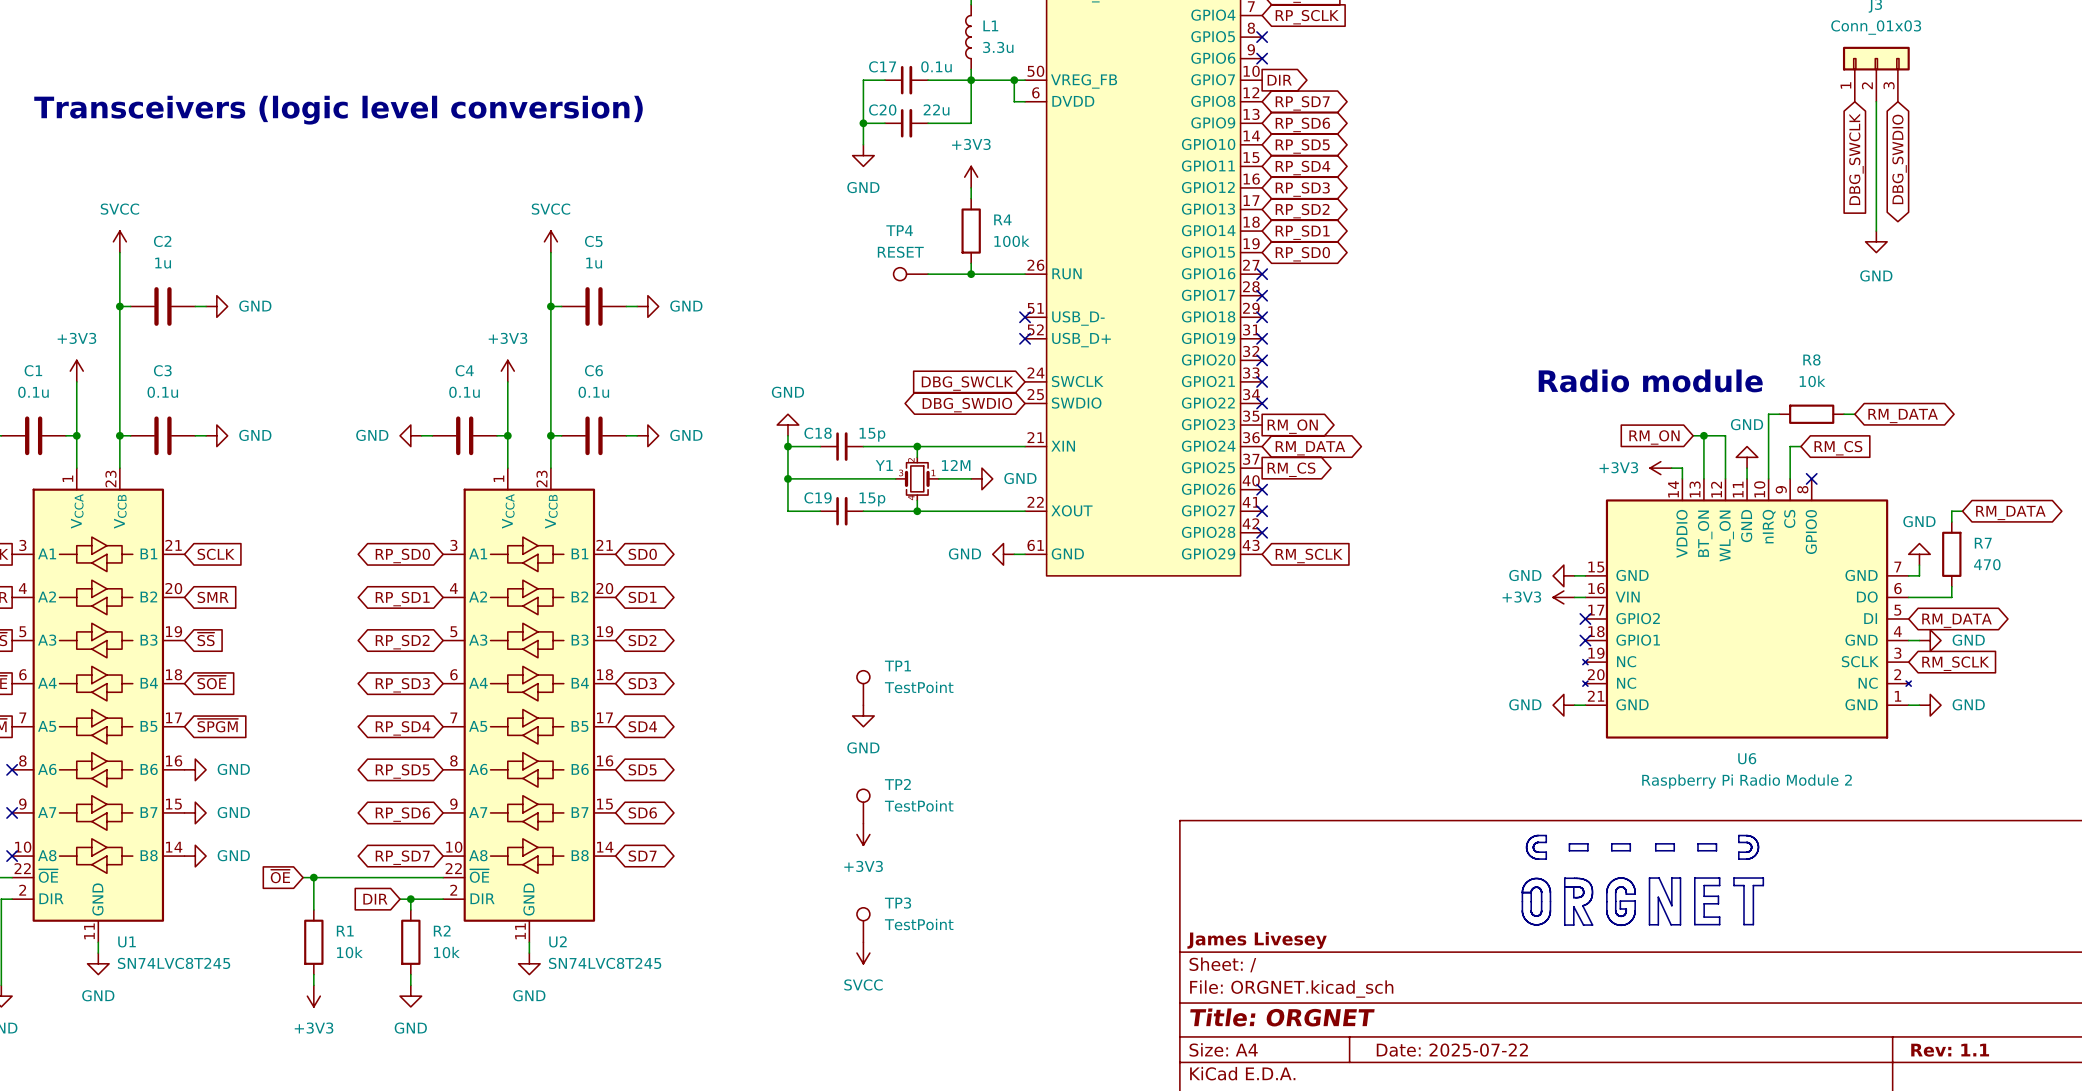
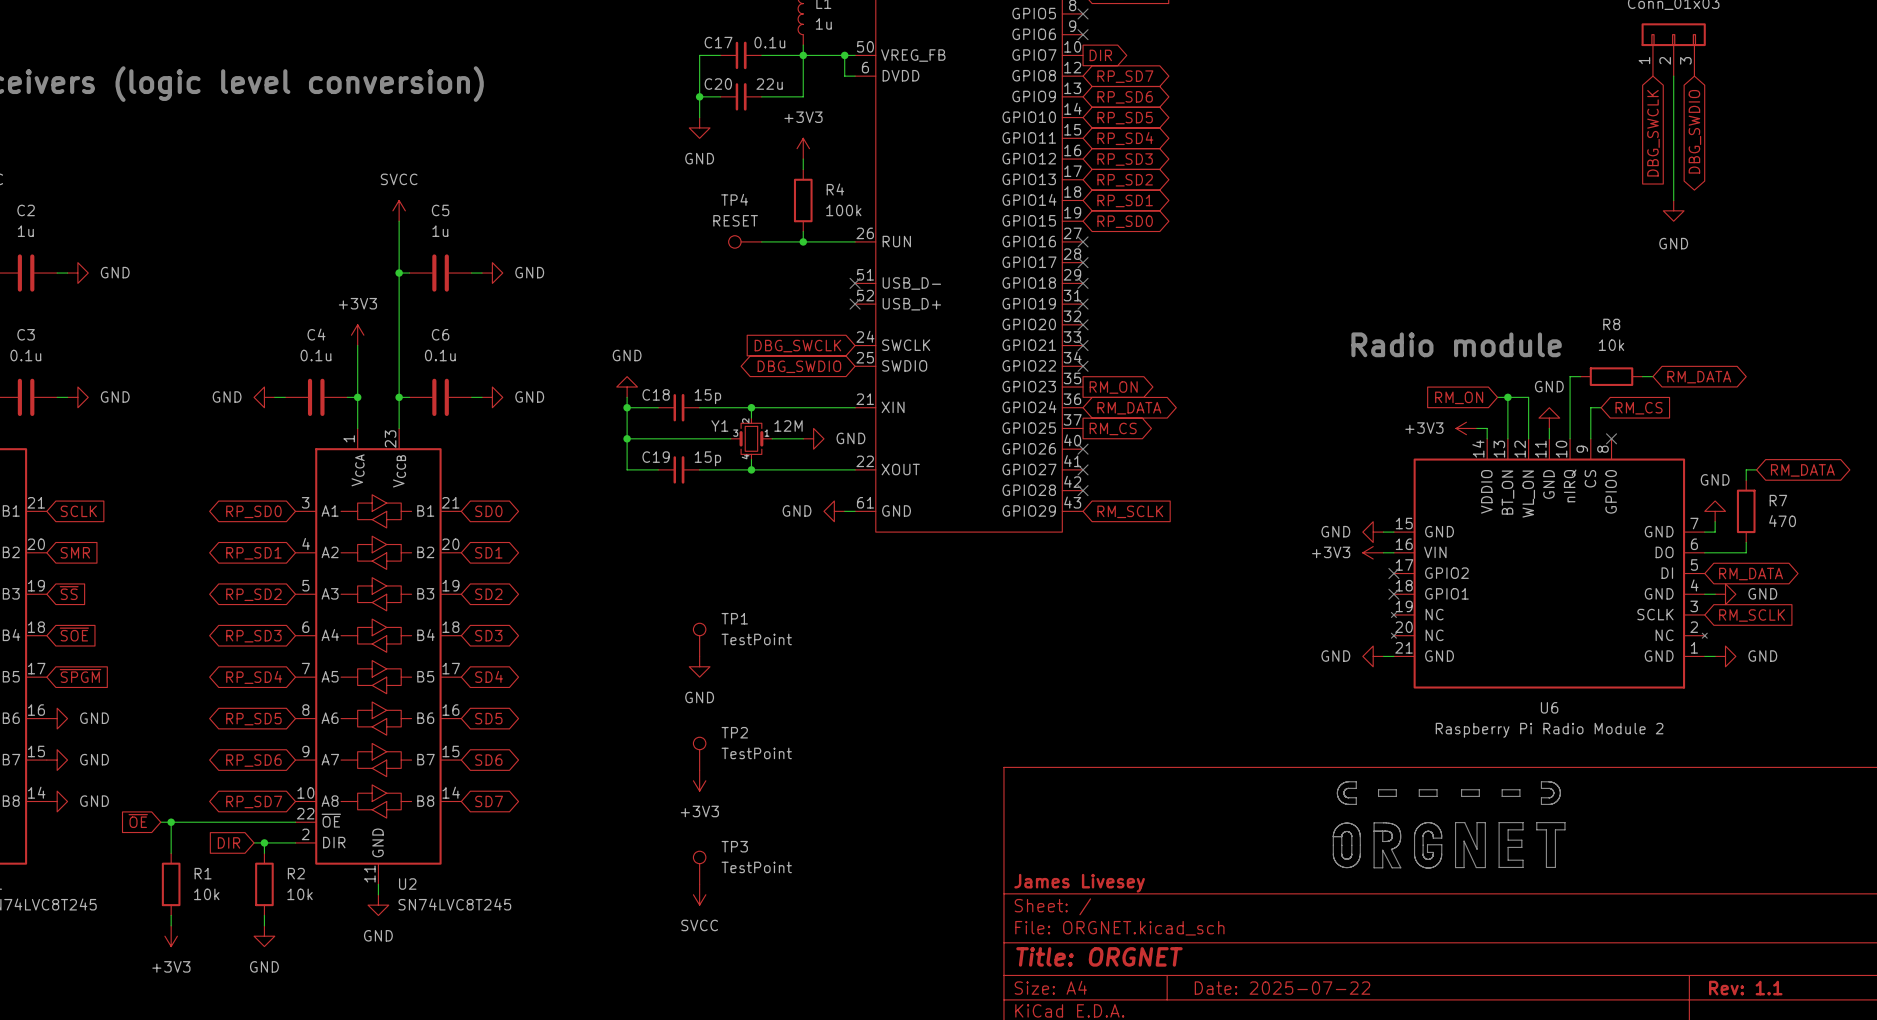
L1 value: 3.3u (998, 47) -> 1u (823, 23)

